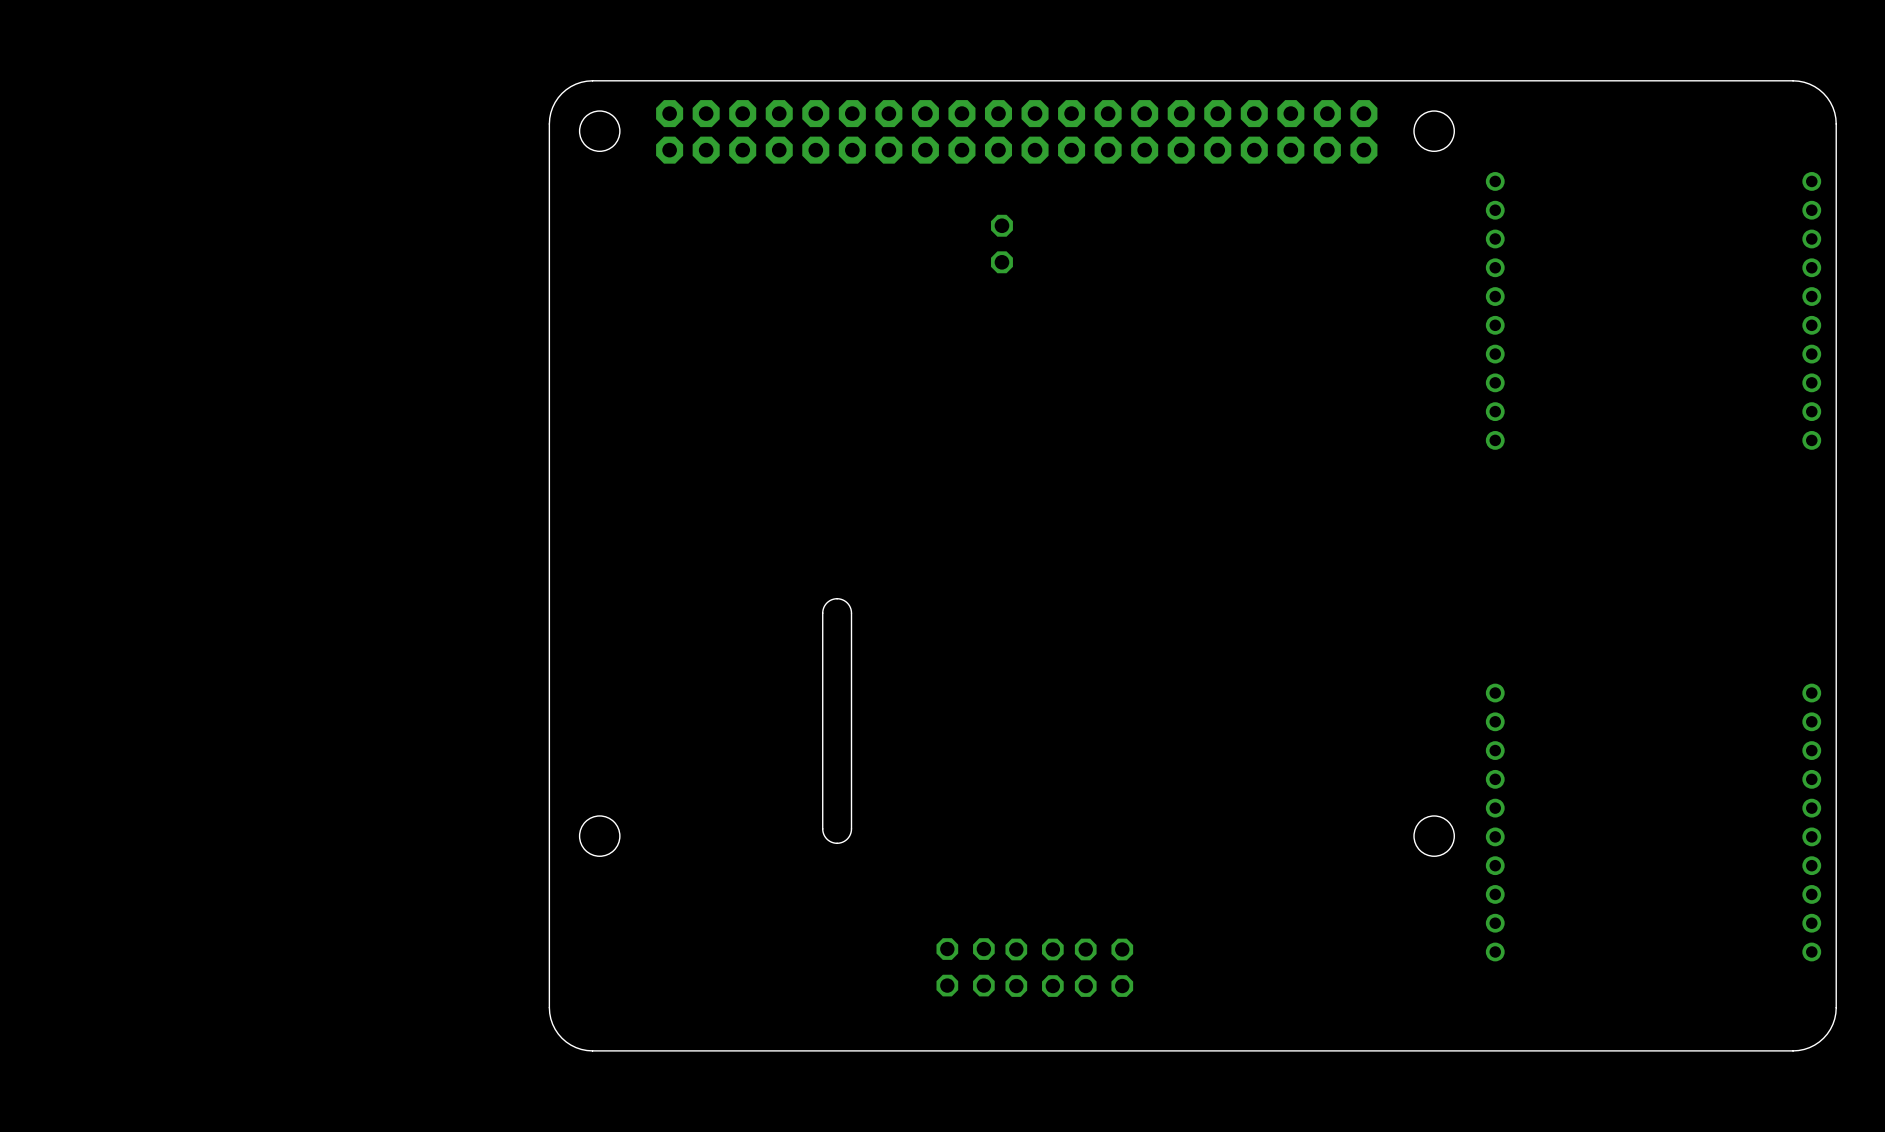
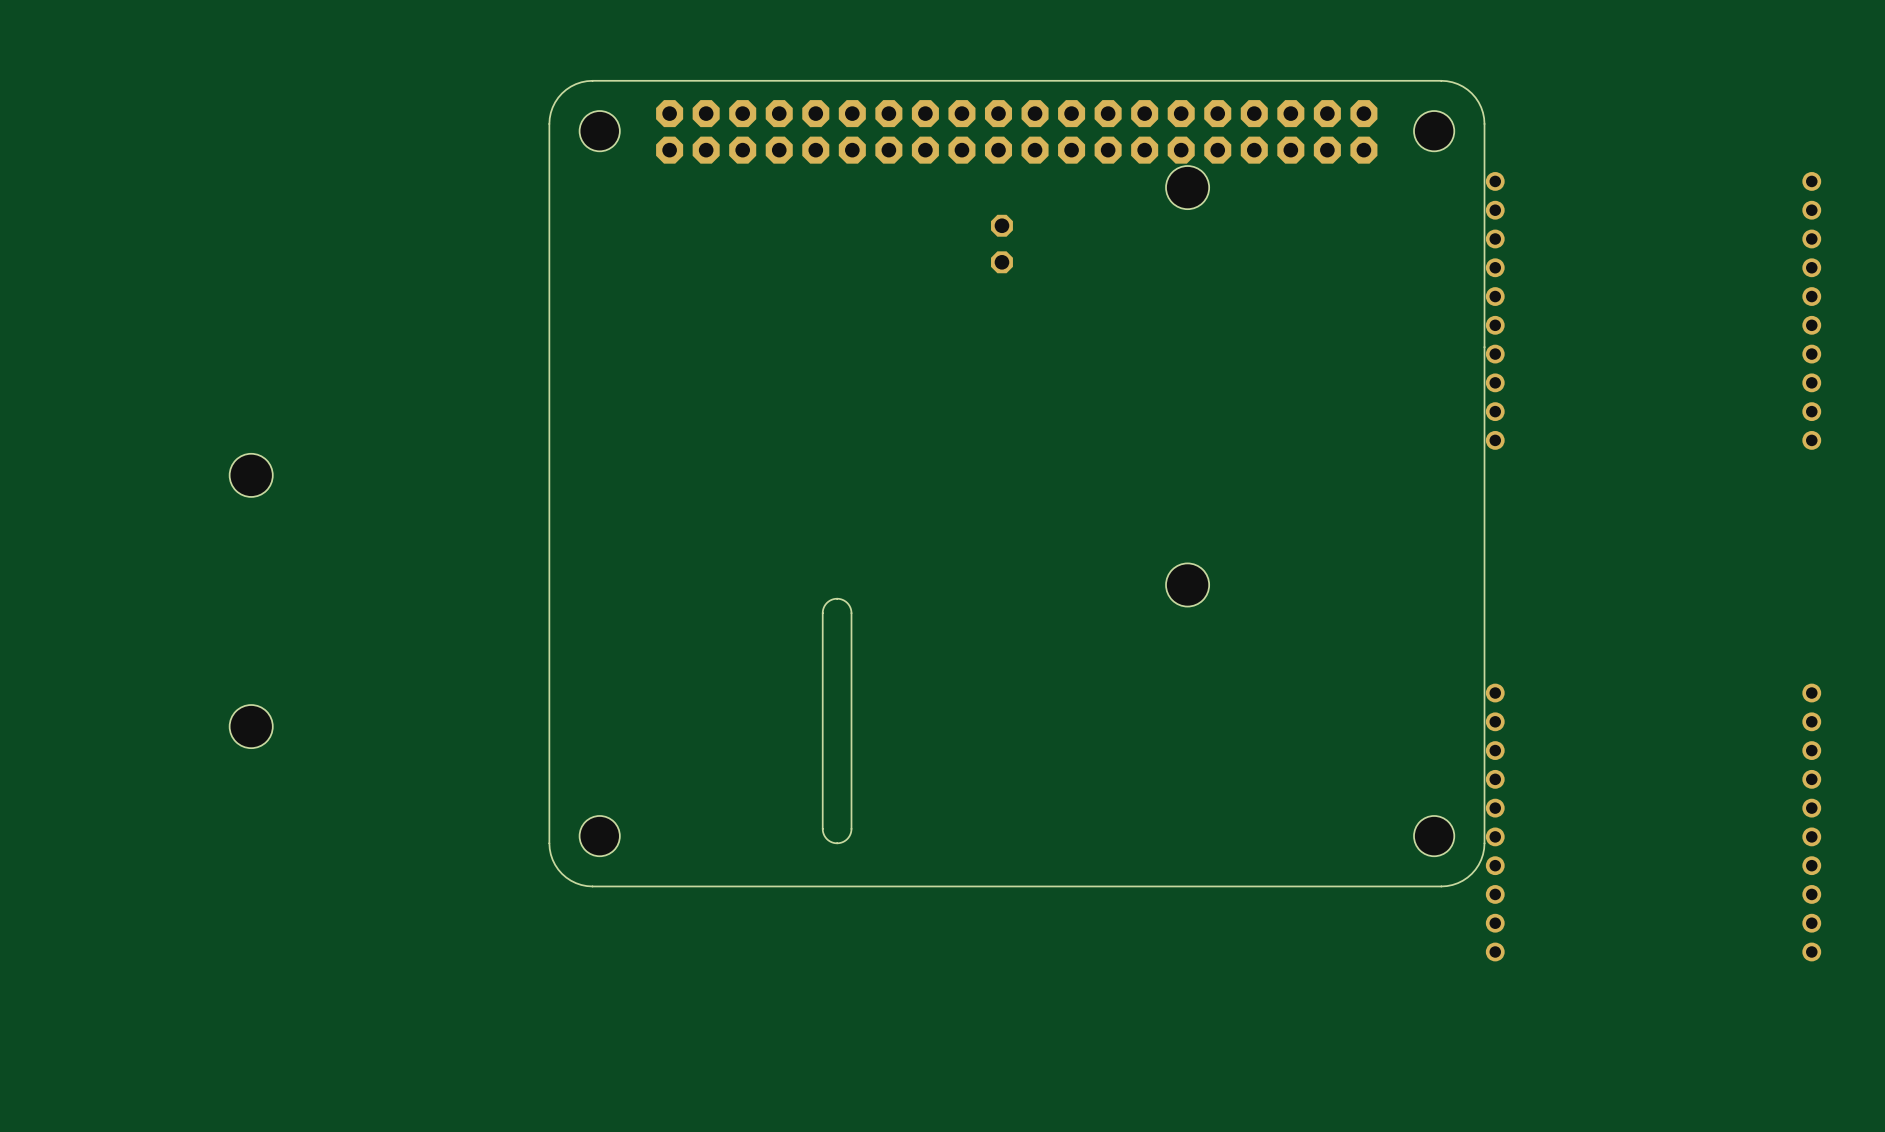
board edge: (1441, 80) (1798, 81) (1819, 89) (1832, 107) (1836, 123) (1836, 1007) (1830, 1029) (1819, 1041) (1804, 1049) (1793, 1050) (586, 1050) (570, 1045) (562, 1038) (555, 1029) (549, 1013) (549, 843) -> (1441, 80) (1457, 84) (1471, 93) (1481, 107) (1484, 123) (1484, 843) (1478, 864) (1467, 877) (1452, 884) (1441, 886) (592, 886) (576, 883) (562, 873) (552, 859) (549, 843)
hole: none -> (1187, 187)
hole: none -> (251, 475)
hole: none -> (1187, 584)
hole: none -> (251, 726)
part: (965, 967) -> none
part: (1034, 967) -> none
part: (1104, 967) -> none

